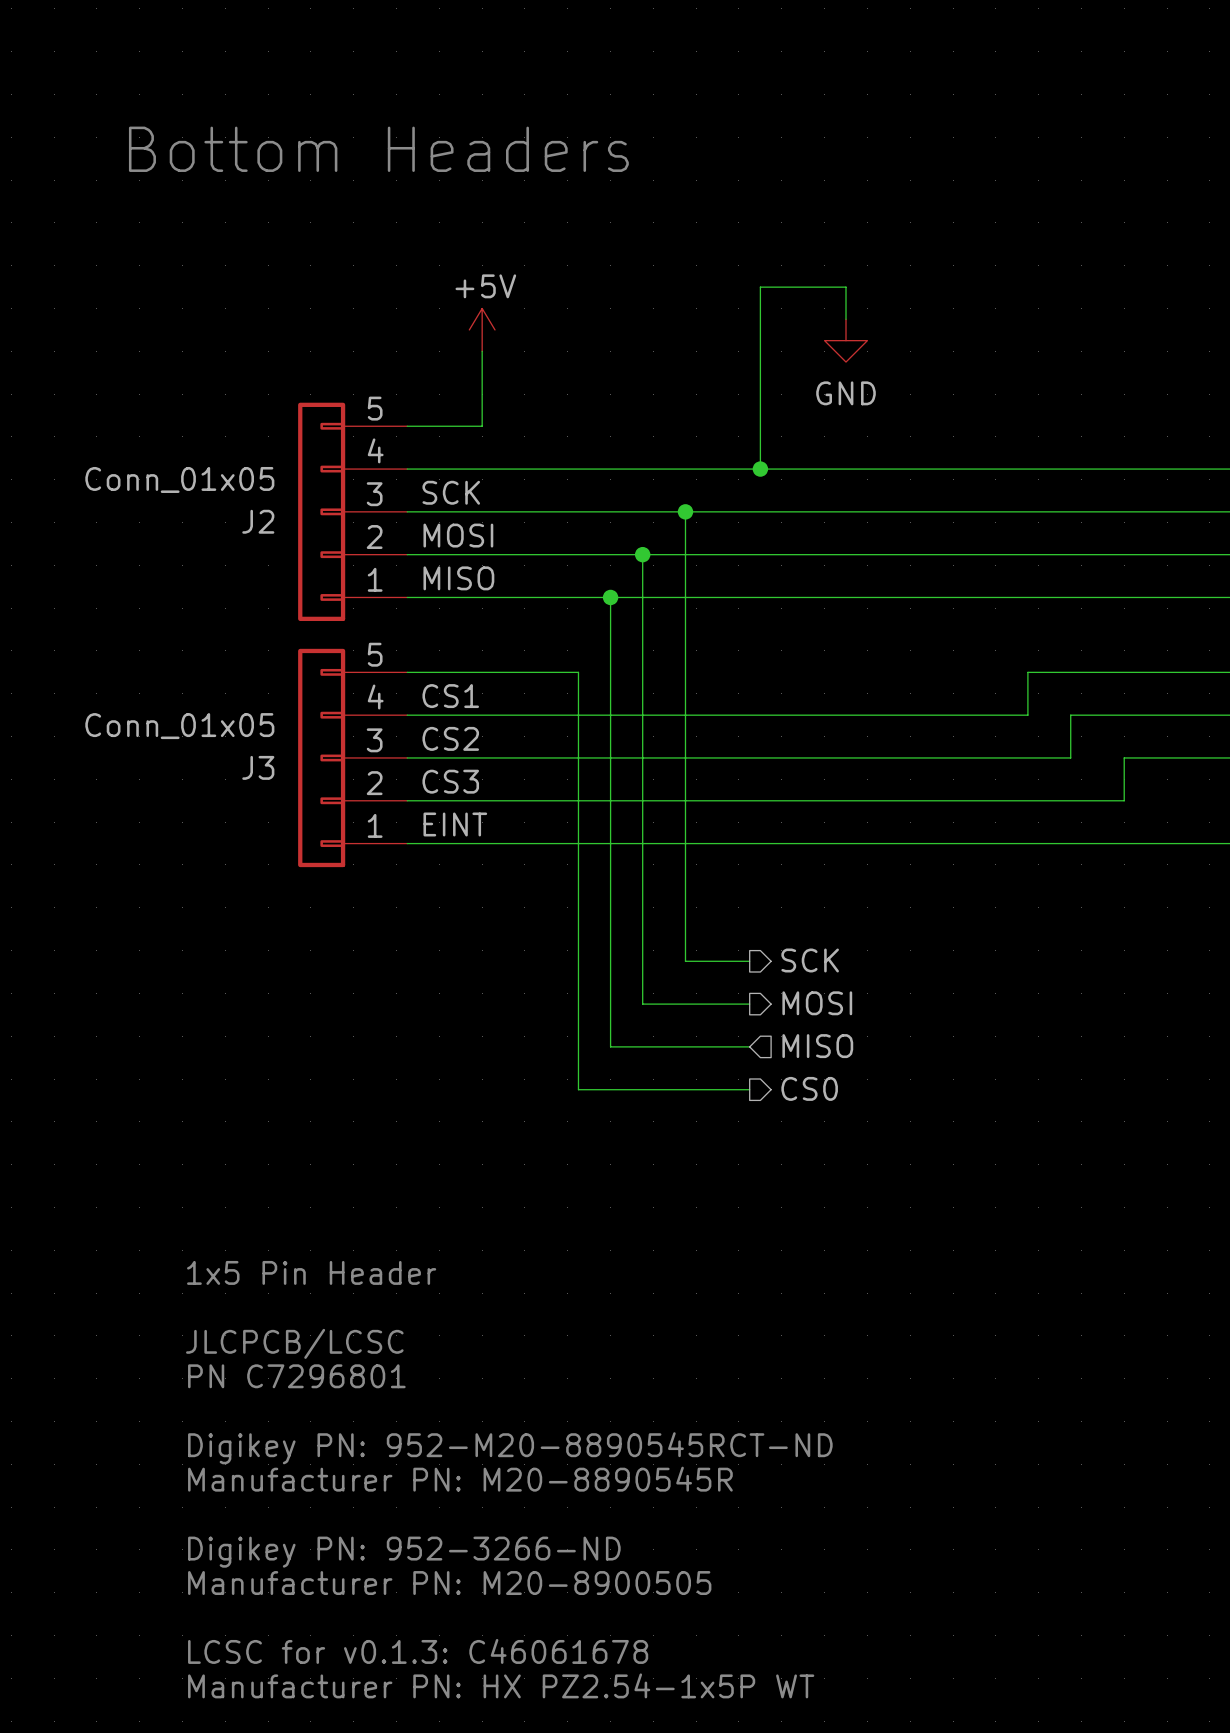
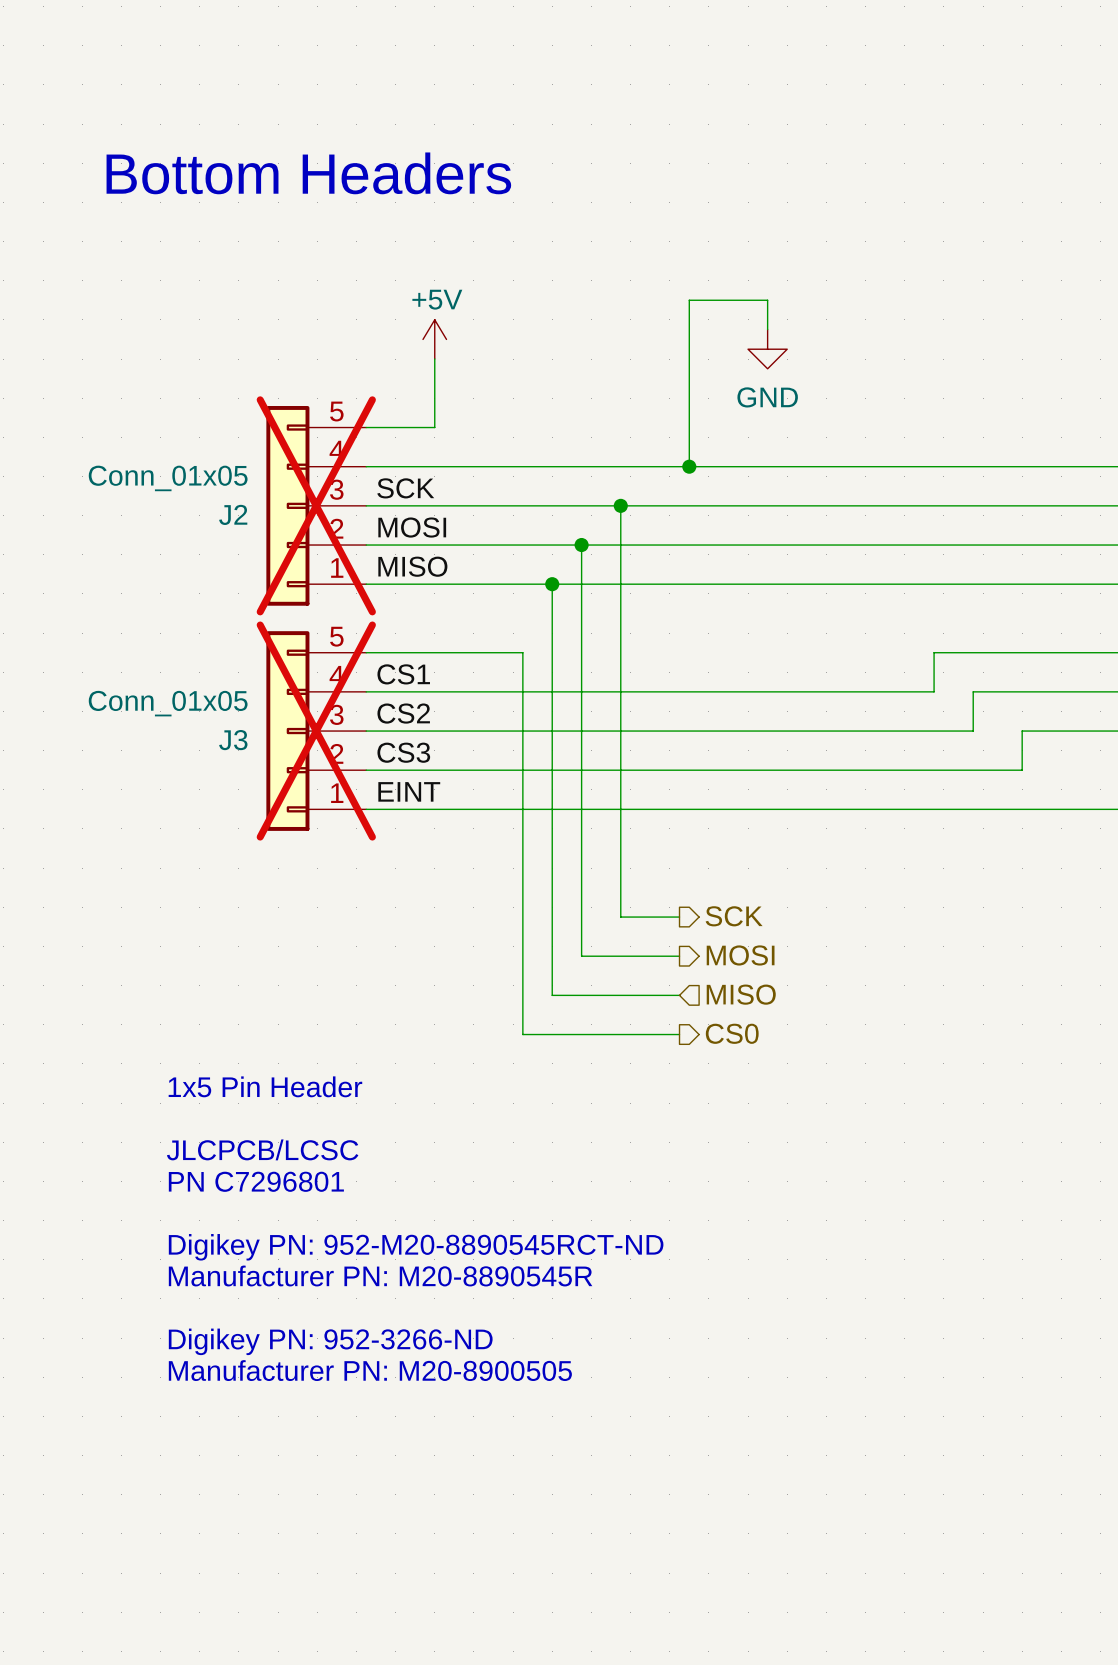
J2 do-not-place cross: none -> (316, 505)
J3 do-not-place cross: none -> (316, 731)
text position: 1x5 Pin Header (311, 1272) -> 1x5 Pin Header (265, 1086)
text position: JLCPCB/LCSC (294, 1343) -> JLCPCB/LCSC (262, 1149)
text position: PN C7296801 (296, 1376) -> PN C7296801 (256, 1181)
text position: Digikey PN: 952-M20-8890545RCT-ND (510, 1448) -> Digikey PN: 952-M20-8890545RCT-ND (416, 1247)
text position: Manufacturer PN: M20-8890545R (460, 1479) -> Manufacturer PN: M20-8890545R (380, 1276)
text position: Digikey PN: 952-3266-ND (404, 1552) -> Digikey PN: 952-3266-ND (330, 1341)
text position: Manufacturer PN: M20-8900505 (449, 1583) -> Manufacturer PN: M20-8900505 (370, 1370)
text: LCSC for v0.1.3: C46061678 (418, 1651) -> none
text: Manufacturer PN: HX PZ2.54-1x5P WT (501, 1685) -> none

